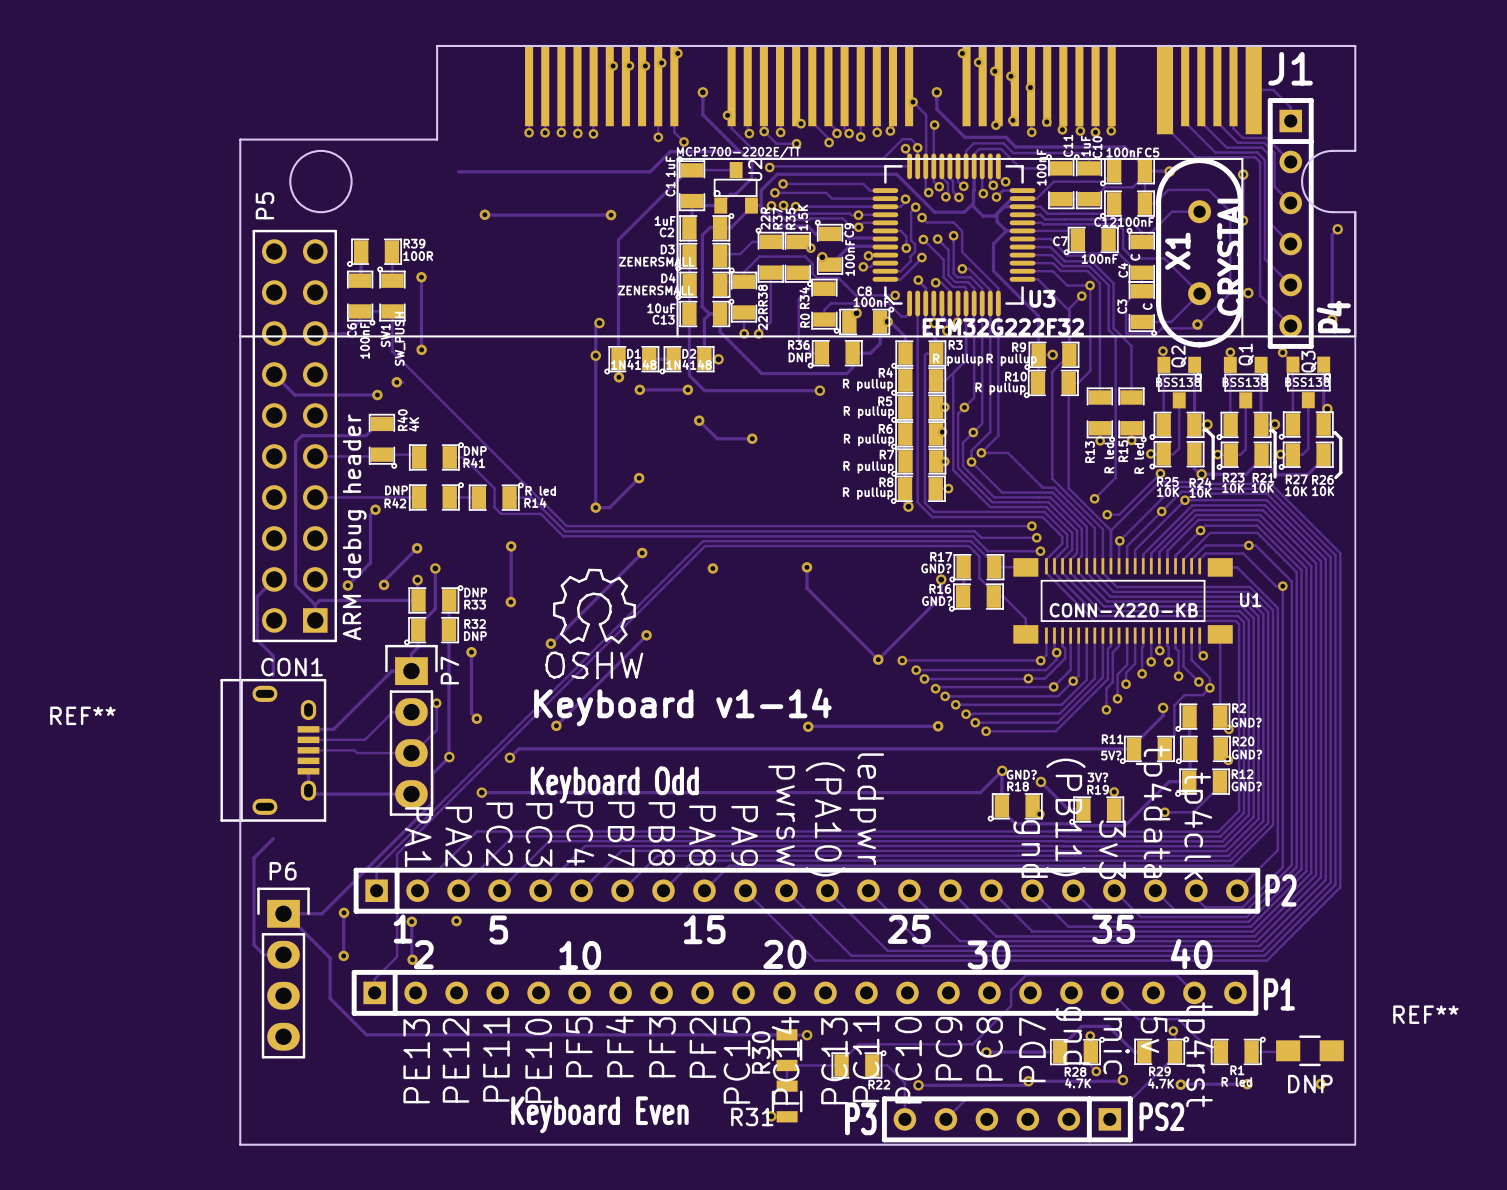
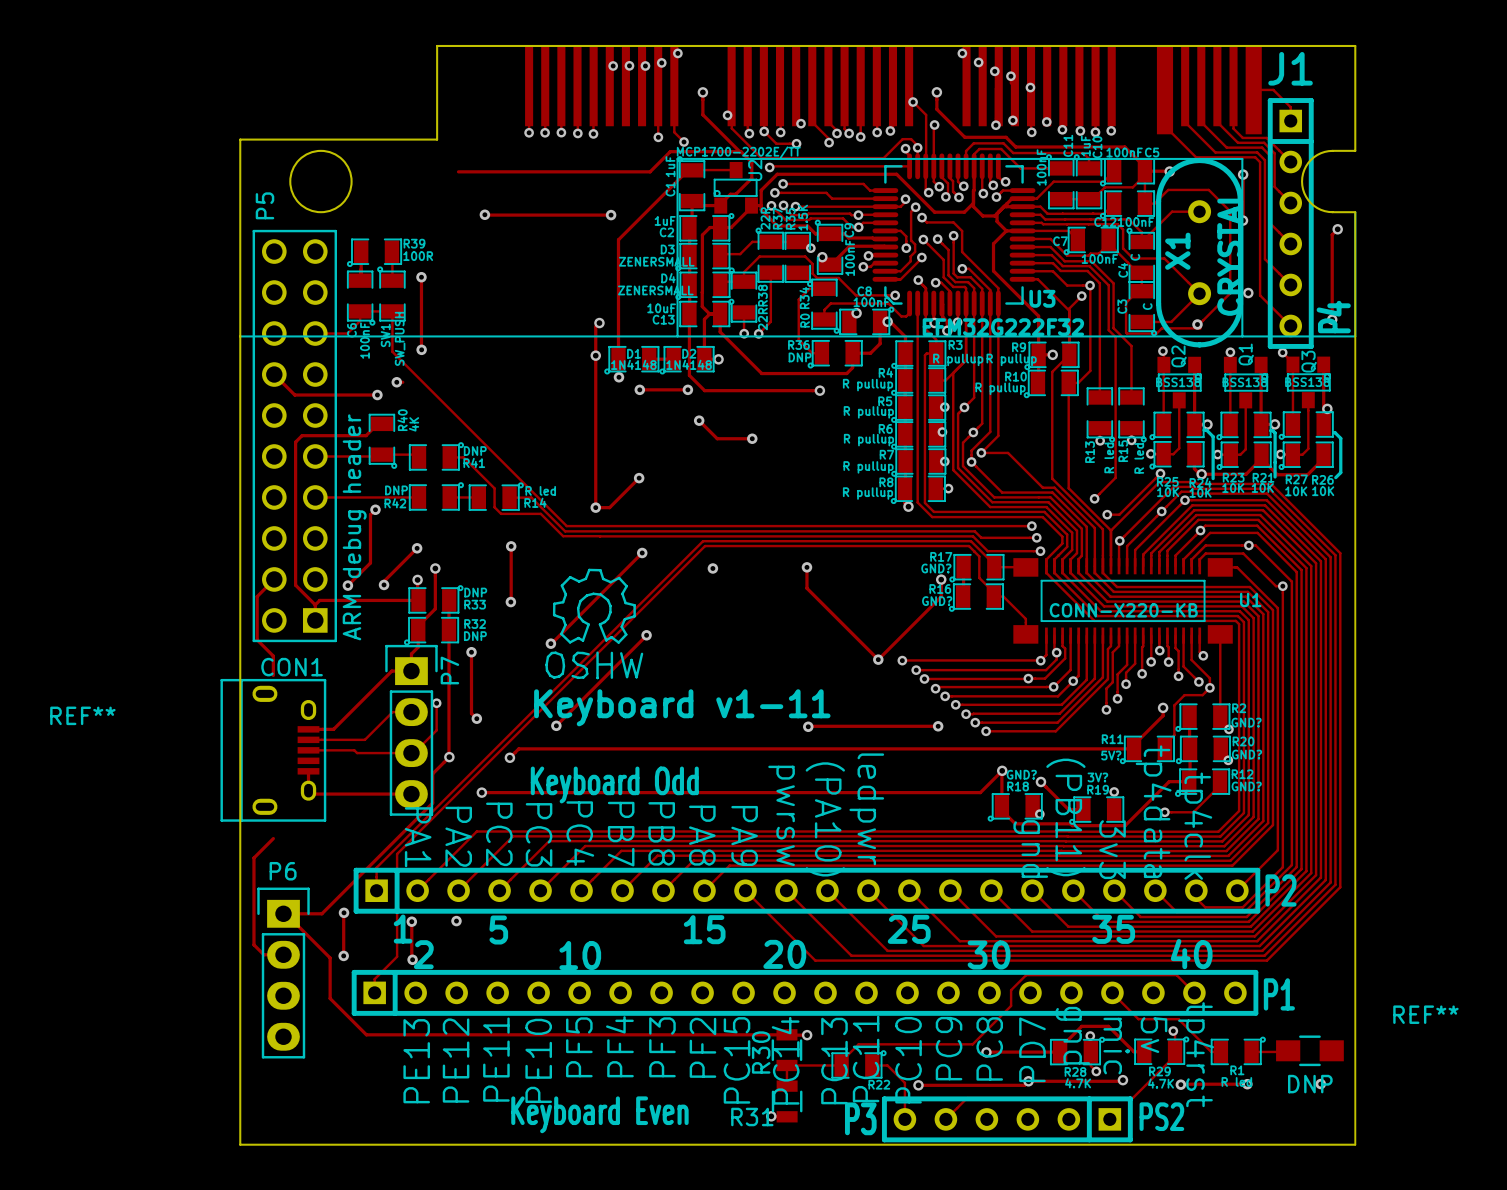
text: Keyboard v1-14 (682, 707) -> Keyboard v1-11 (682, 707)

